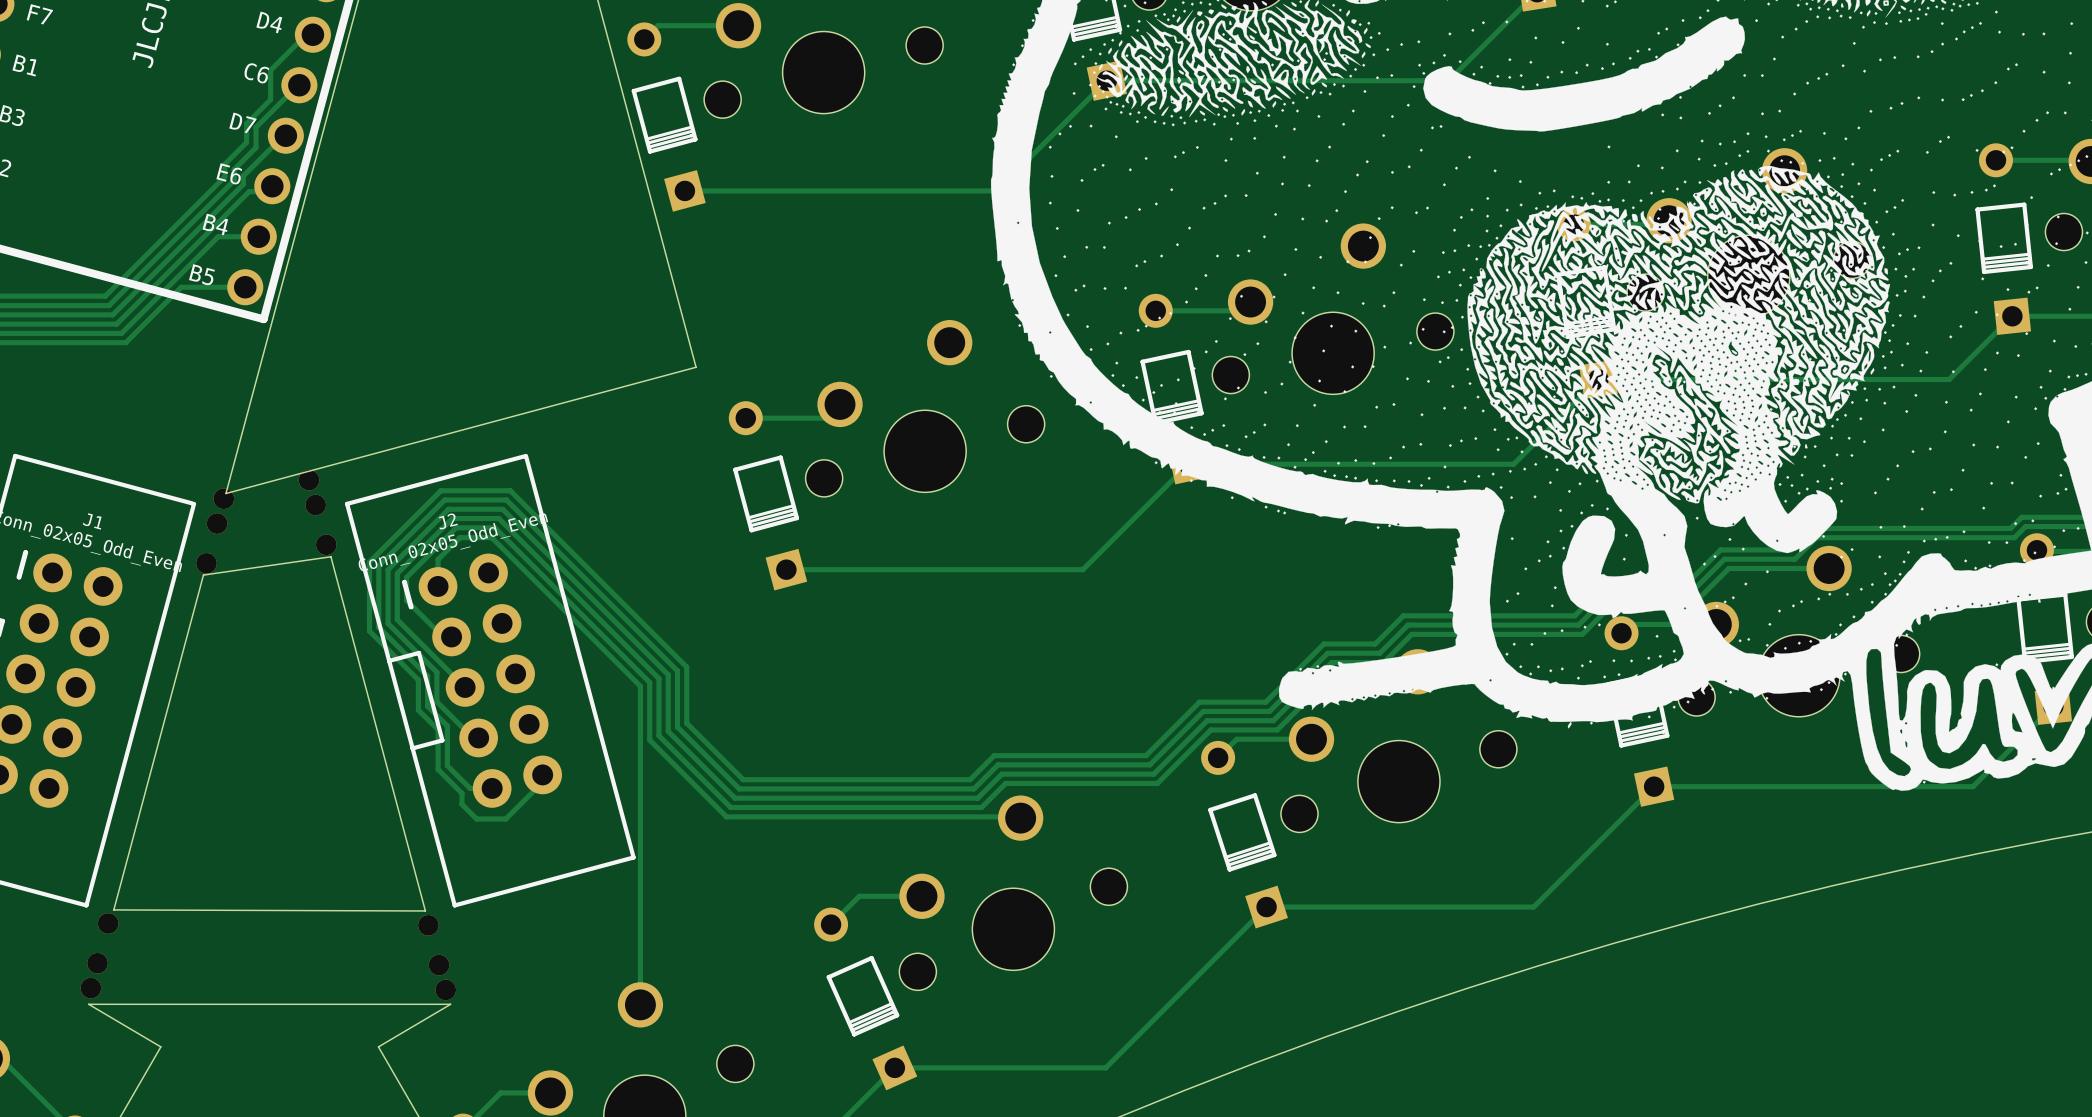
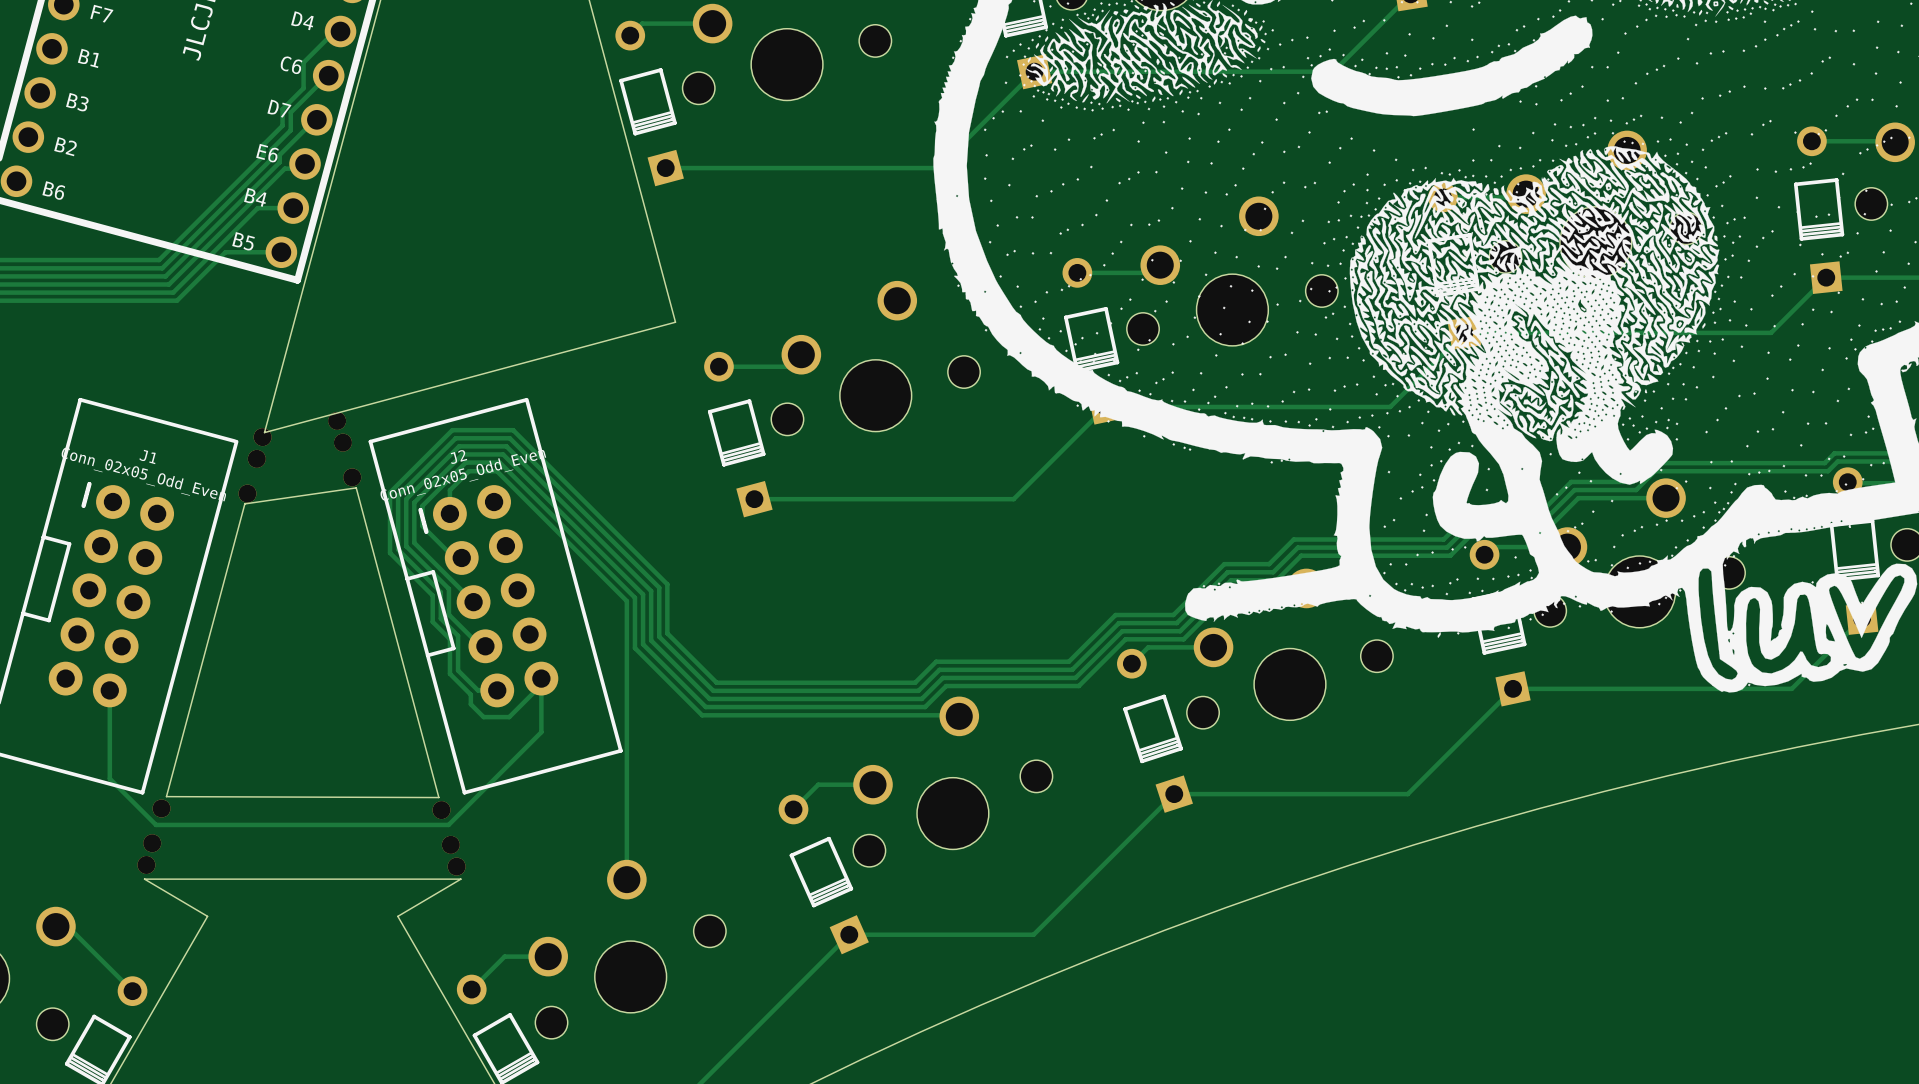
track: none -> (541, 684) (541, 732) (448, 824) (156, 824) (109, 778) (109, 690)

